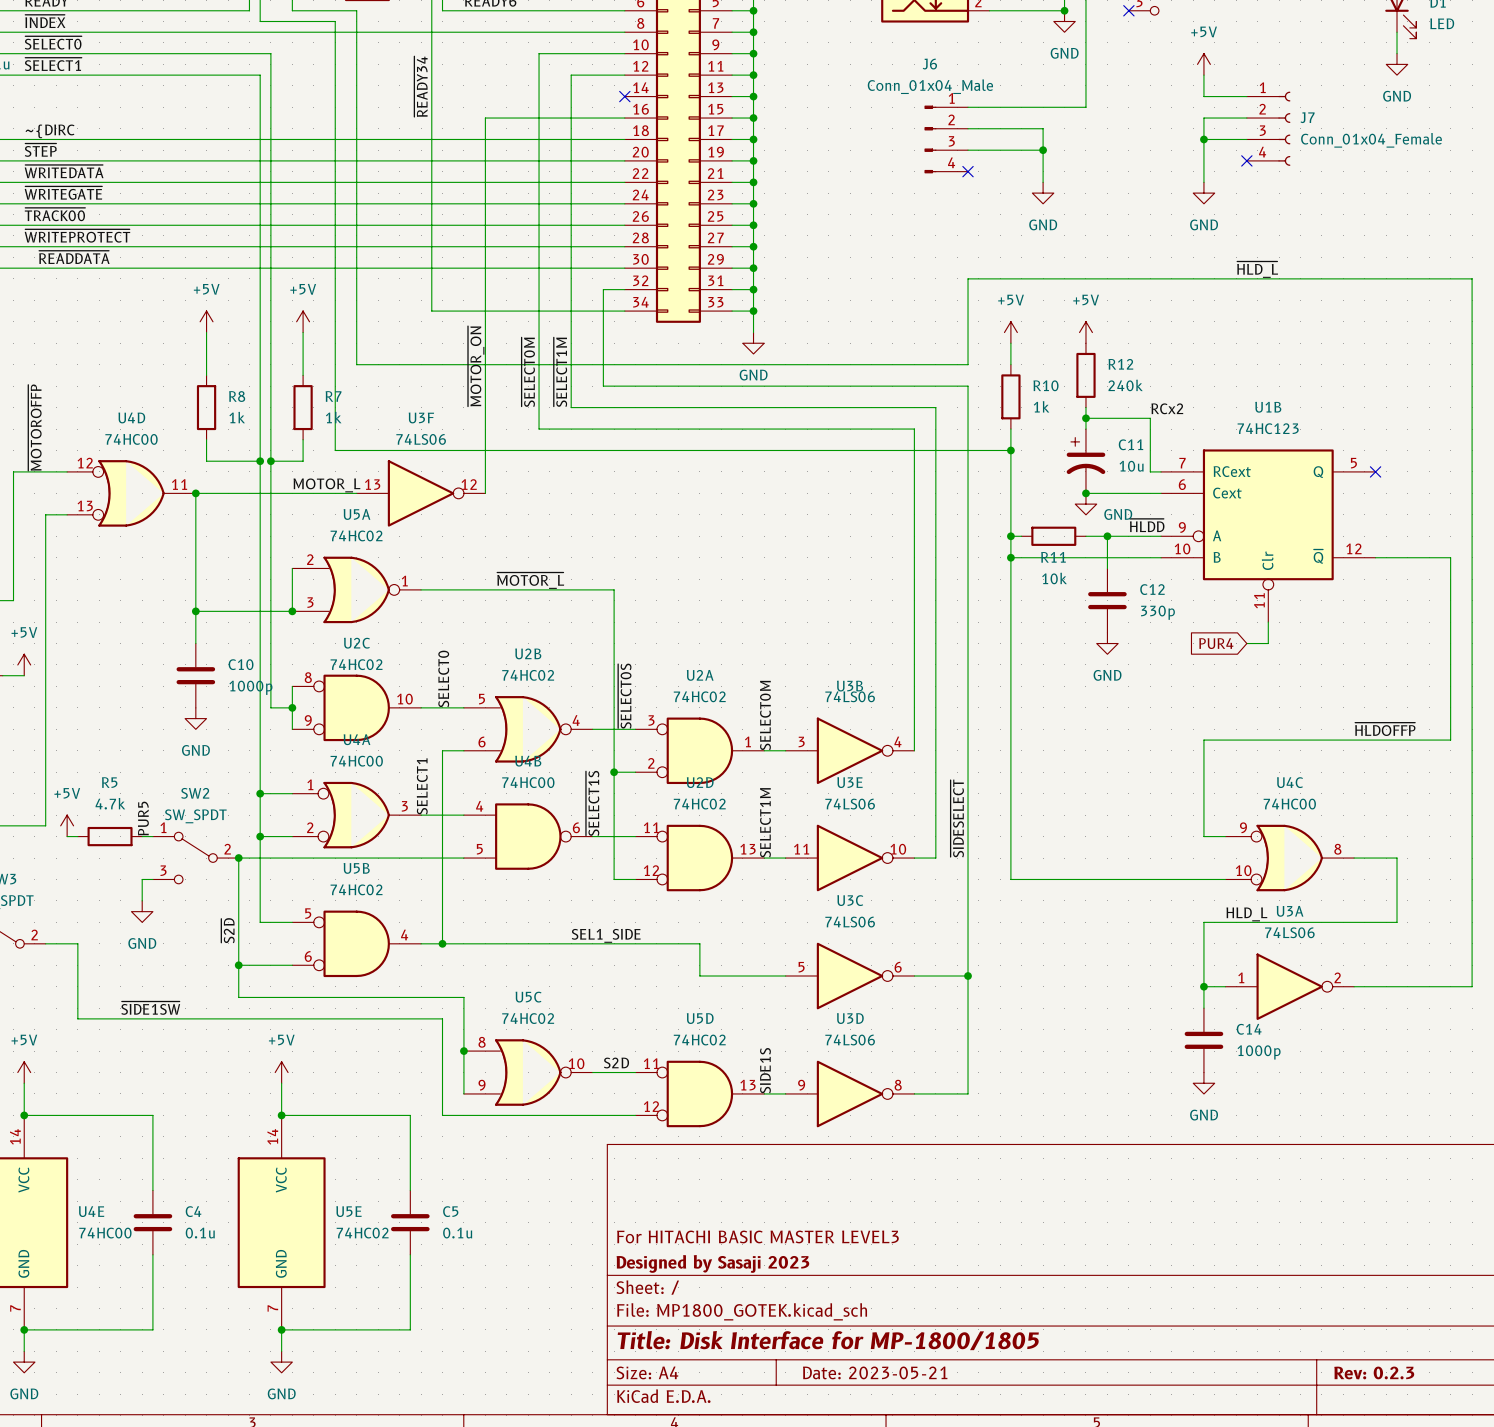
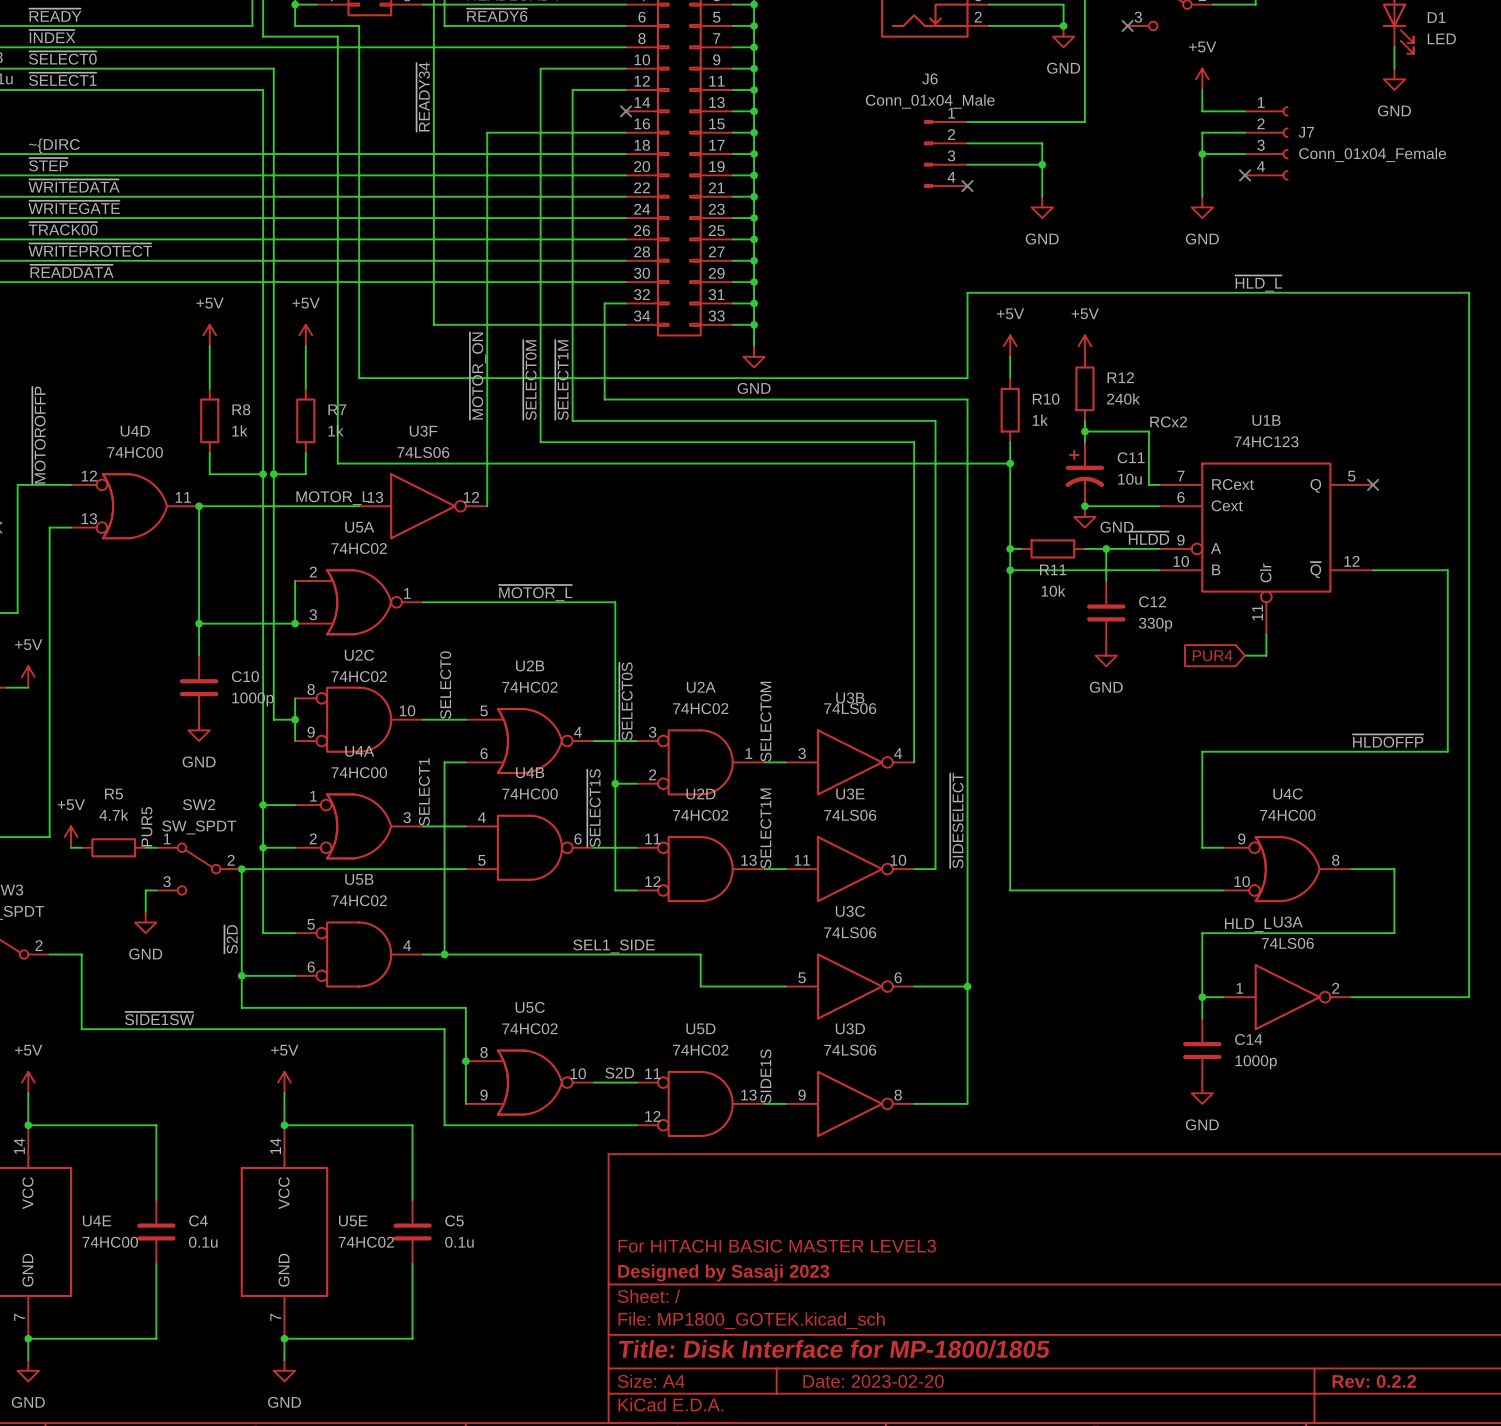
title block: Date: 2023-05-21 (875, 1372) -> Date: 2023-02-20 (873, 1381)
title block: Rev: 0.2.3 (1374, 1372) -> Rev: 0.2.2 (1374, 1381)

